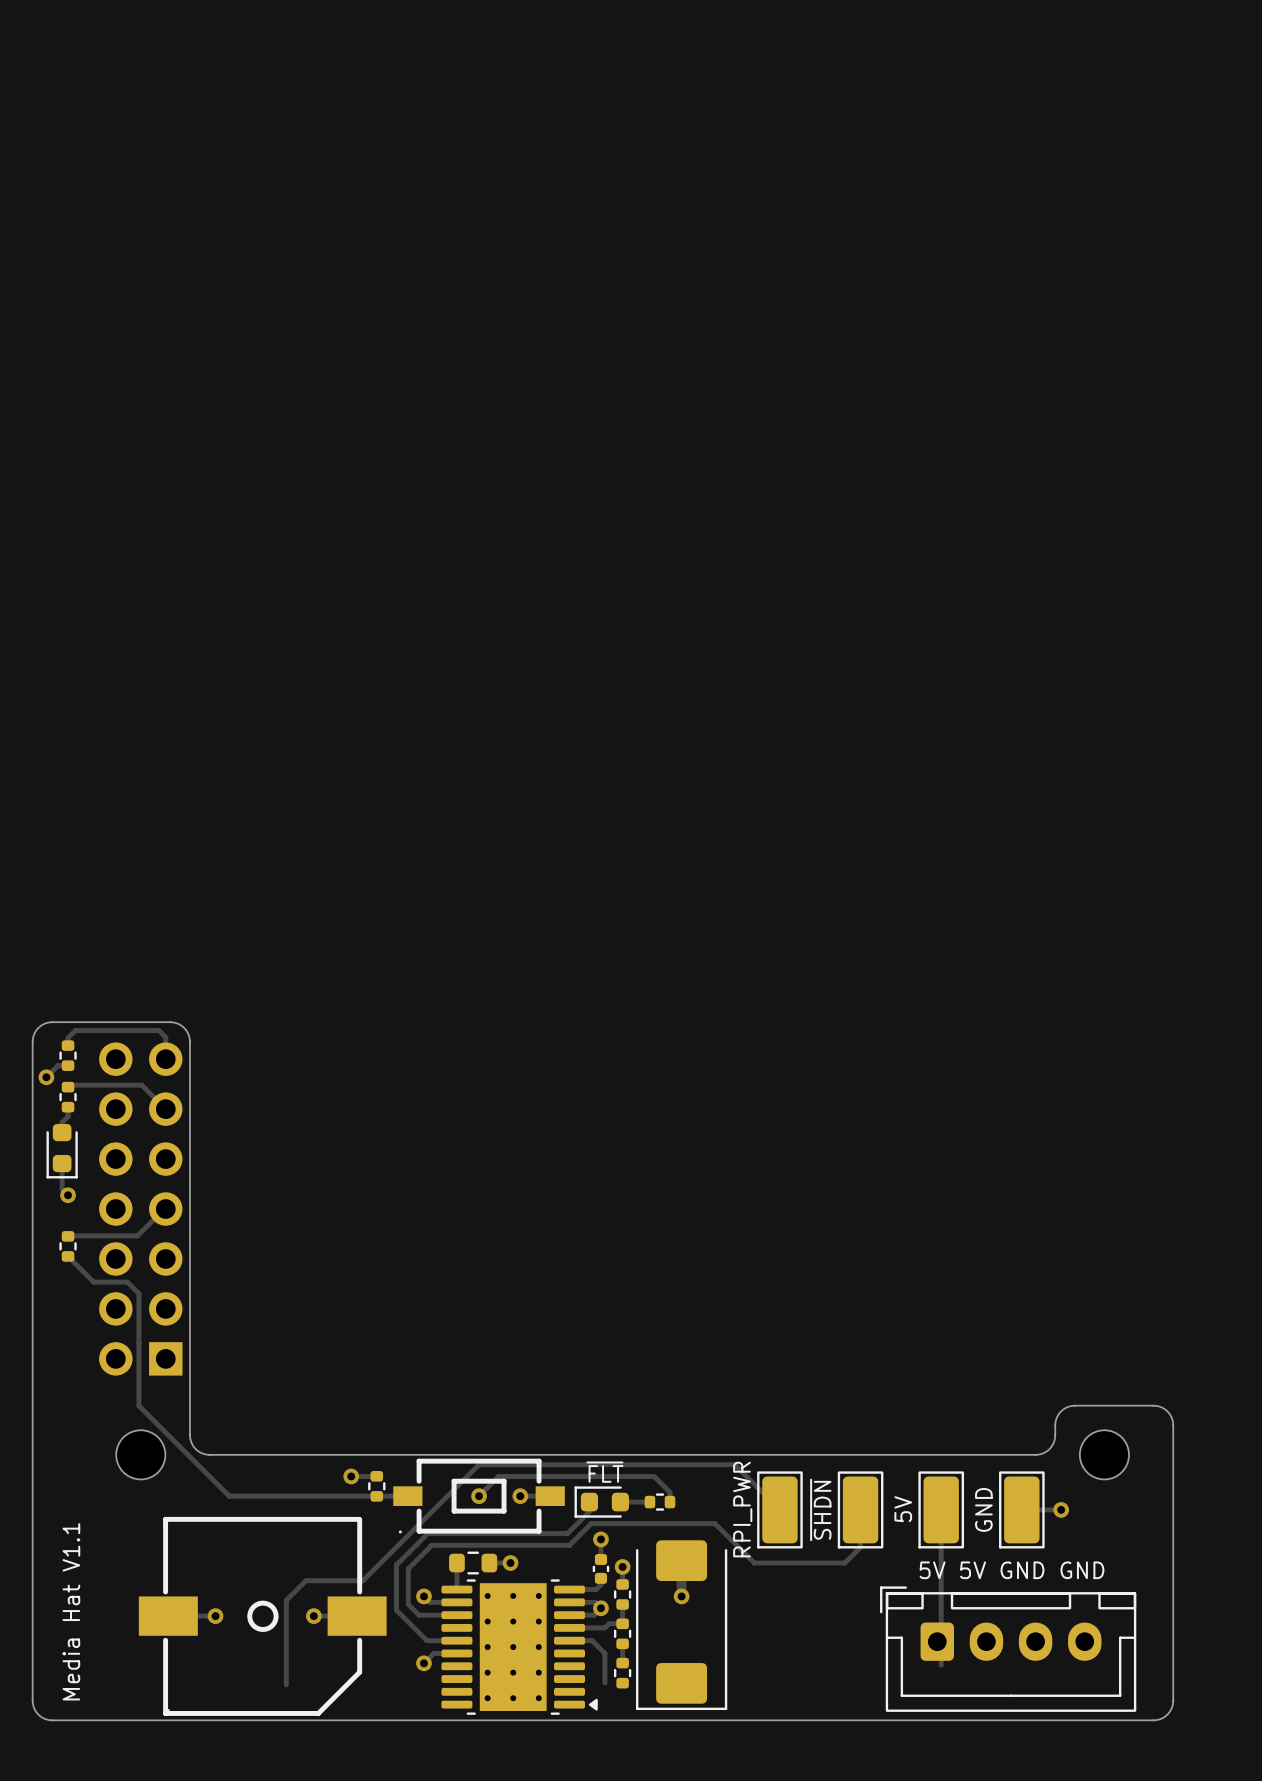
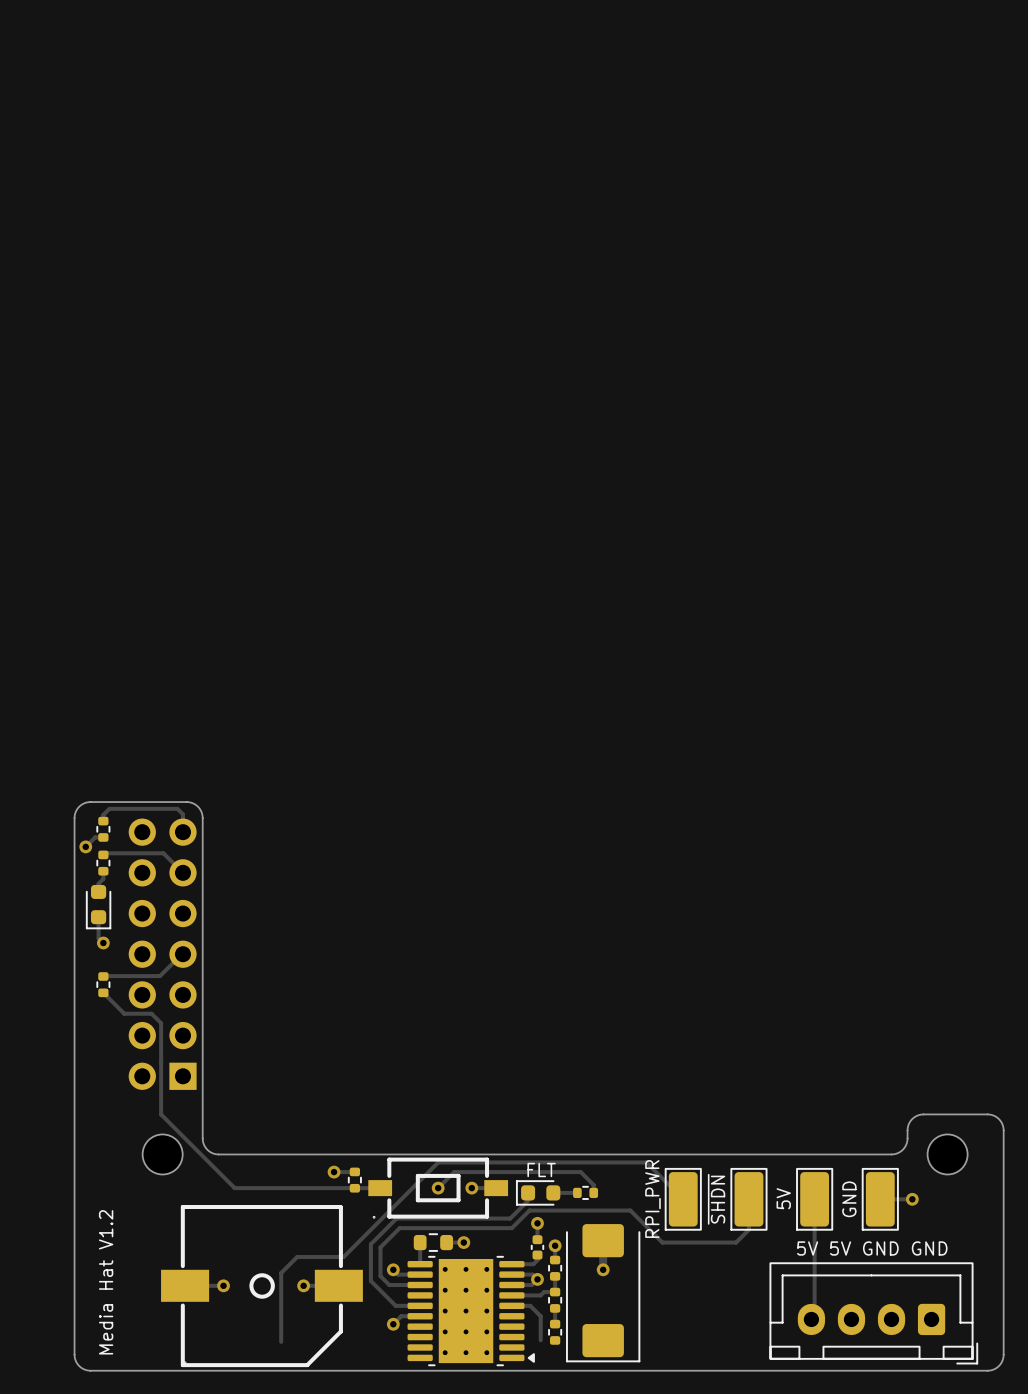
text: ~{FLT} (604, 1472) -> FLT (541, 1170)
text: Media Hat V1.1 (71, 1611) -> Media Hat V1.2 (106, 1282)
part rotation: 0° (1008, 1649) -> 180° (873, 1313)

